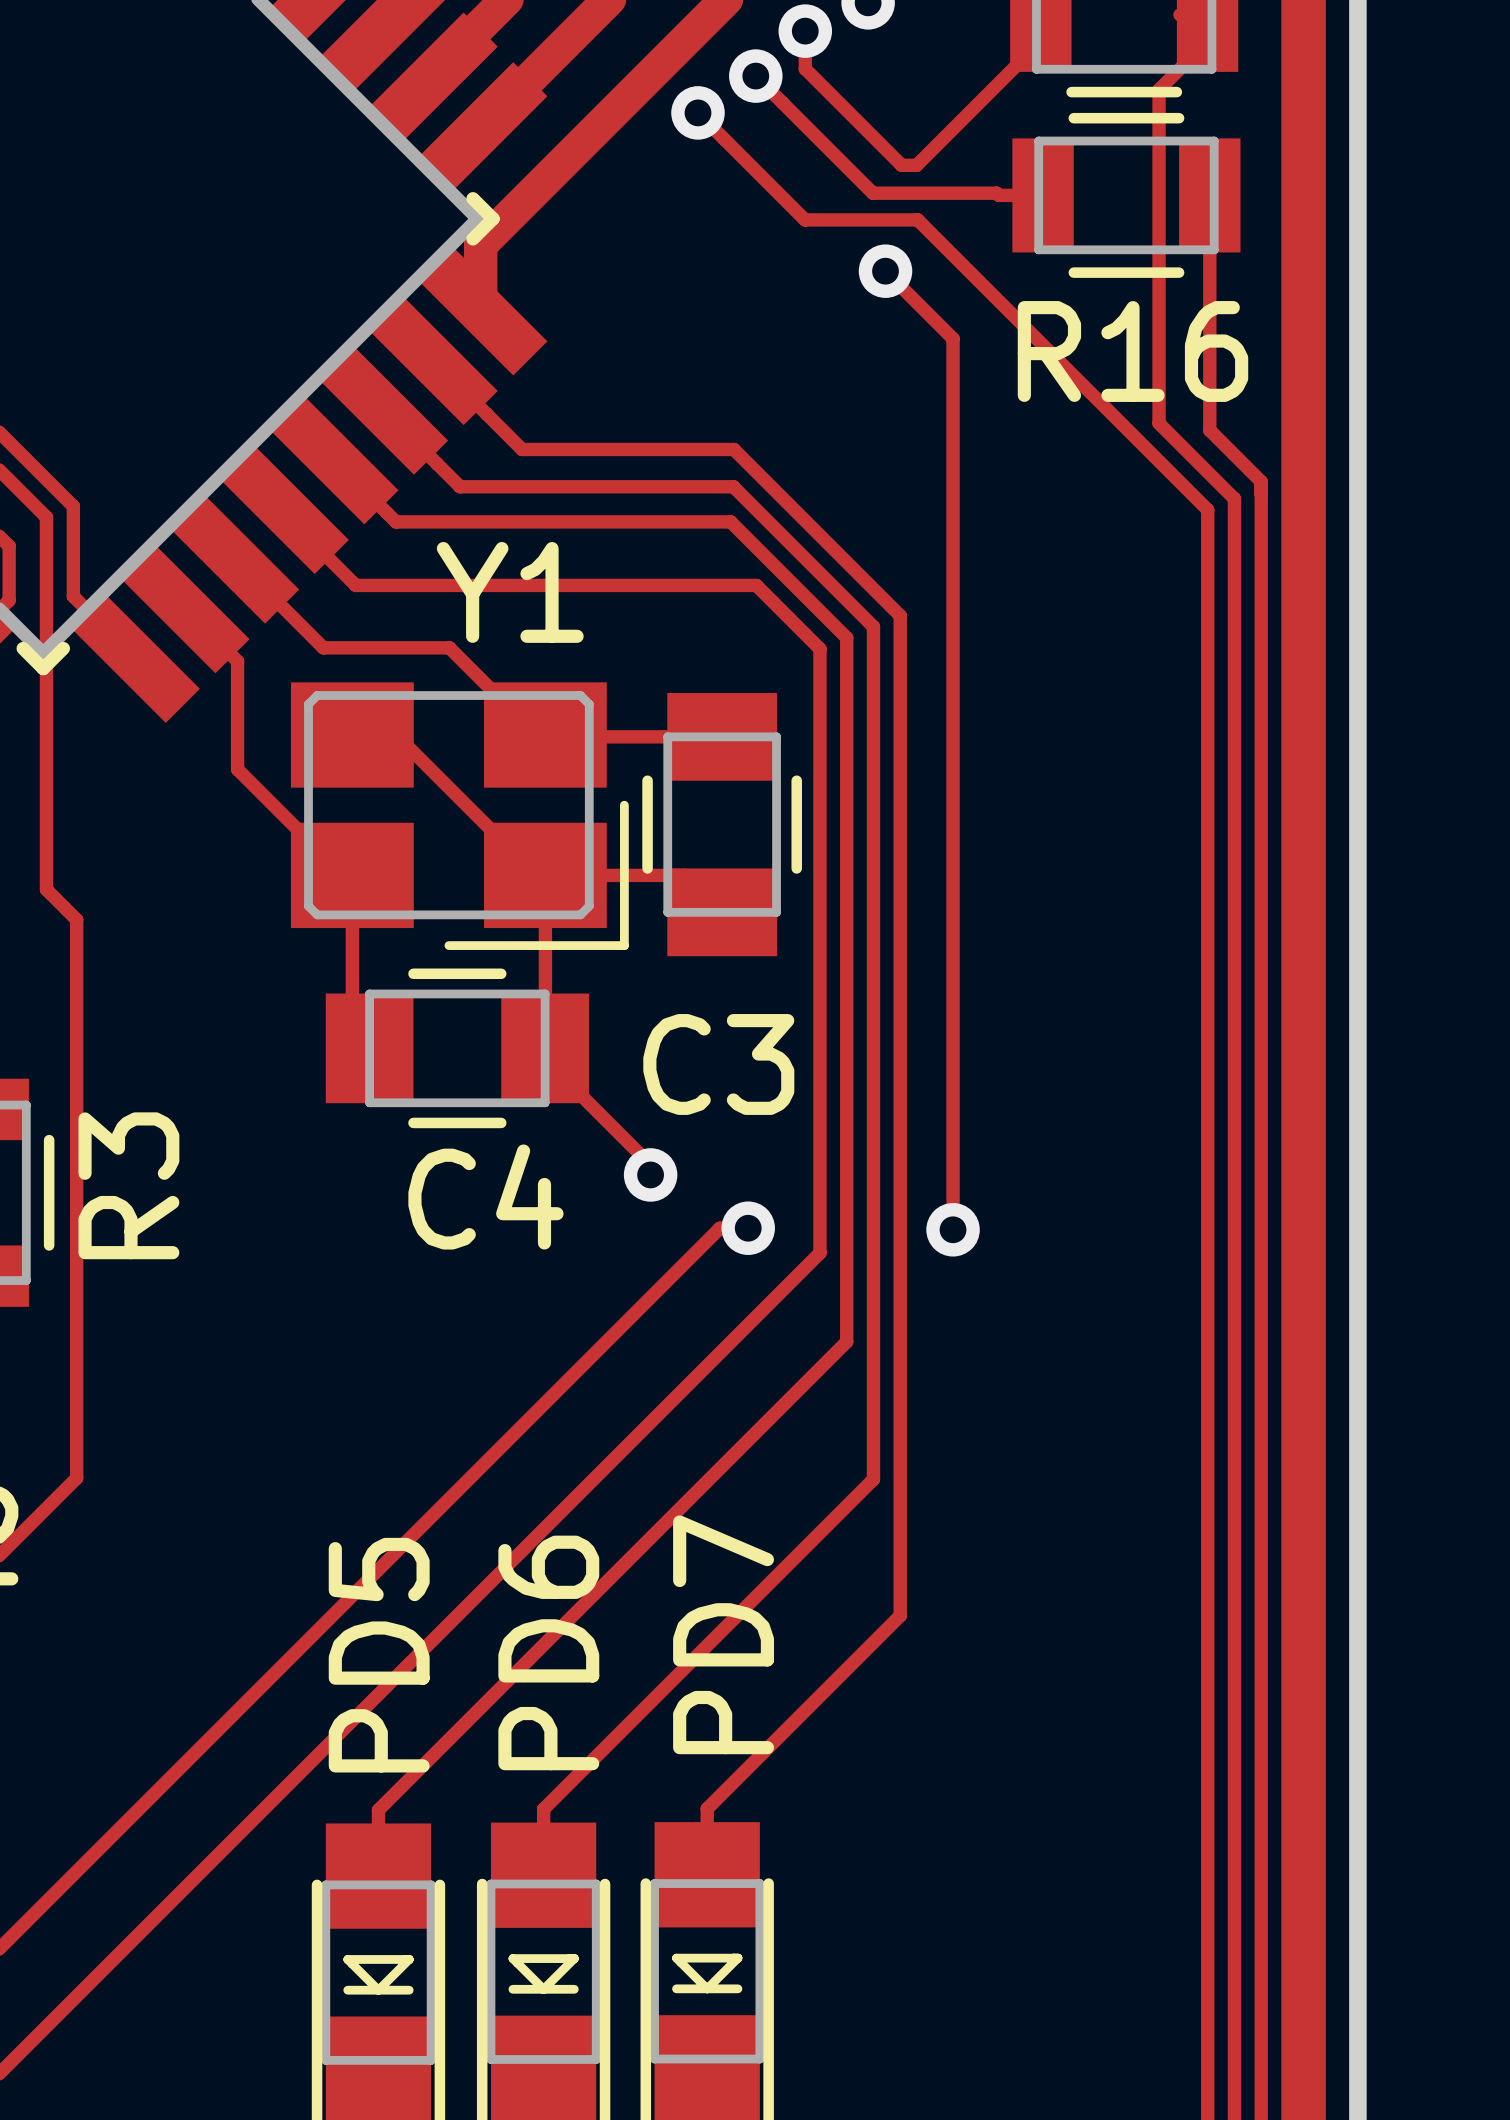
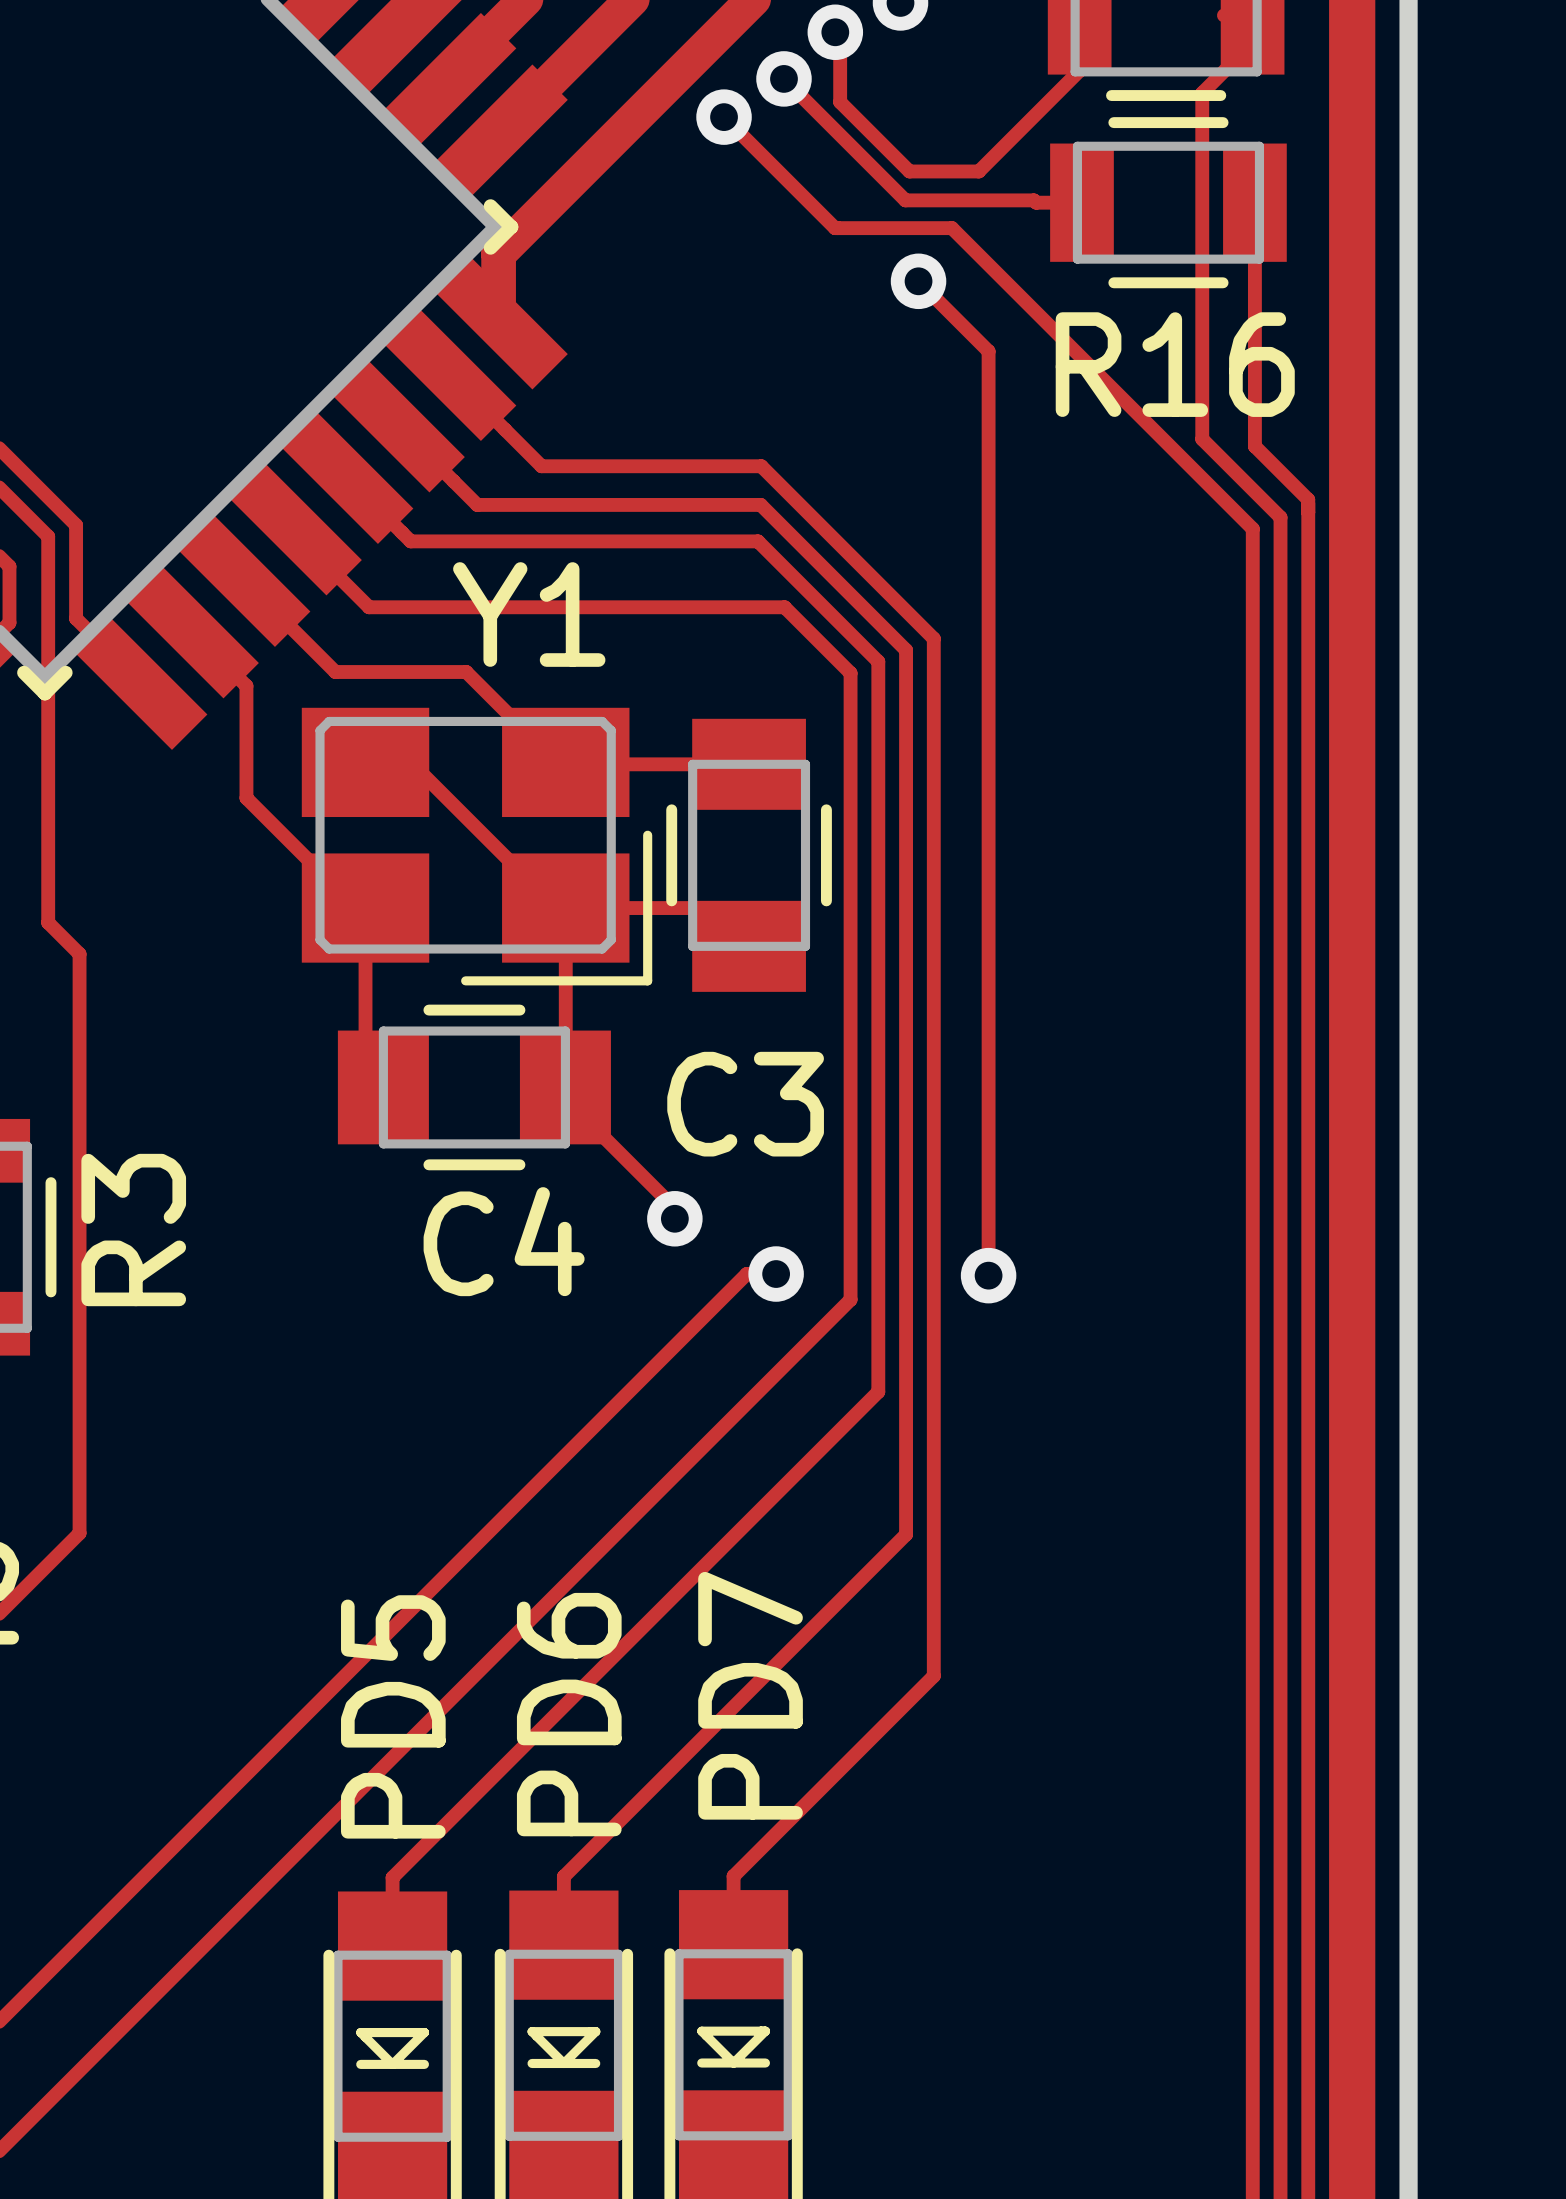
track: (805, 31) (805, 68) (901, 165) -> (843, 26) (840, 29) (840, 102) (909, 171) (935, 171)
track: (1040, 41) (916, 165) -> (1079, 42) (1079, 70) (978, 171) (950, 171)

